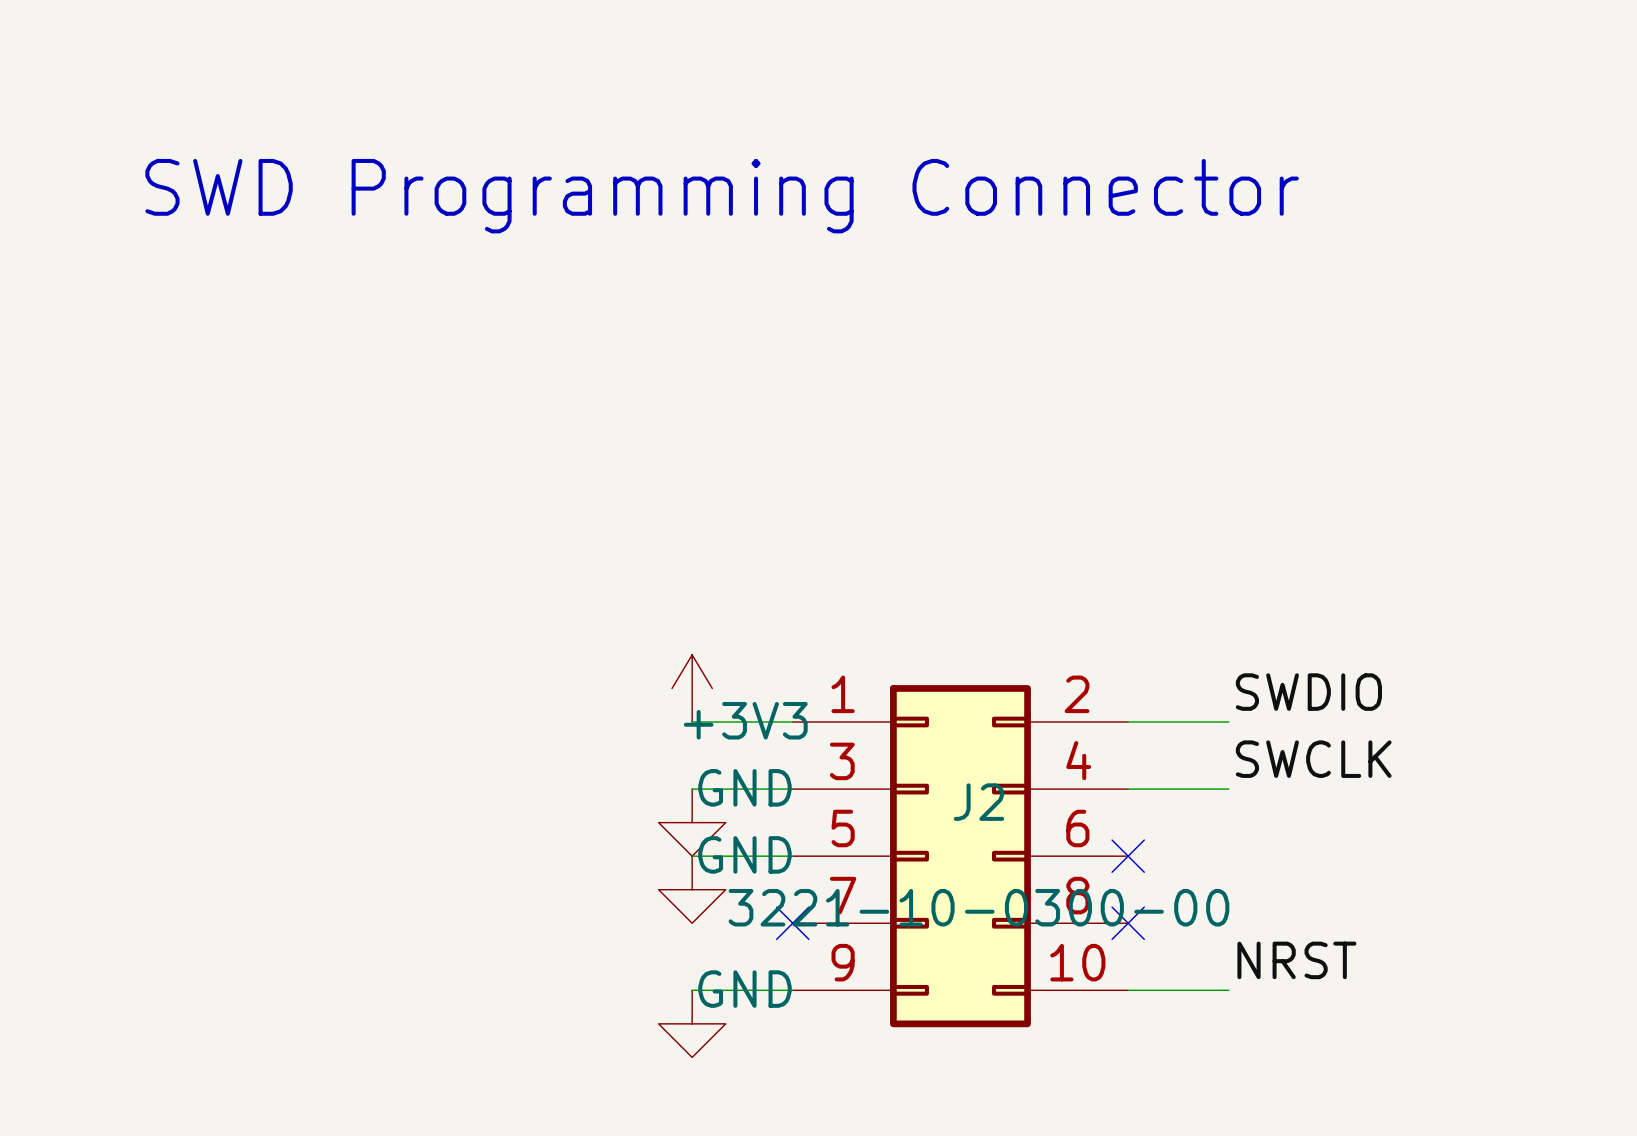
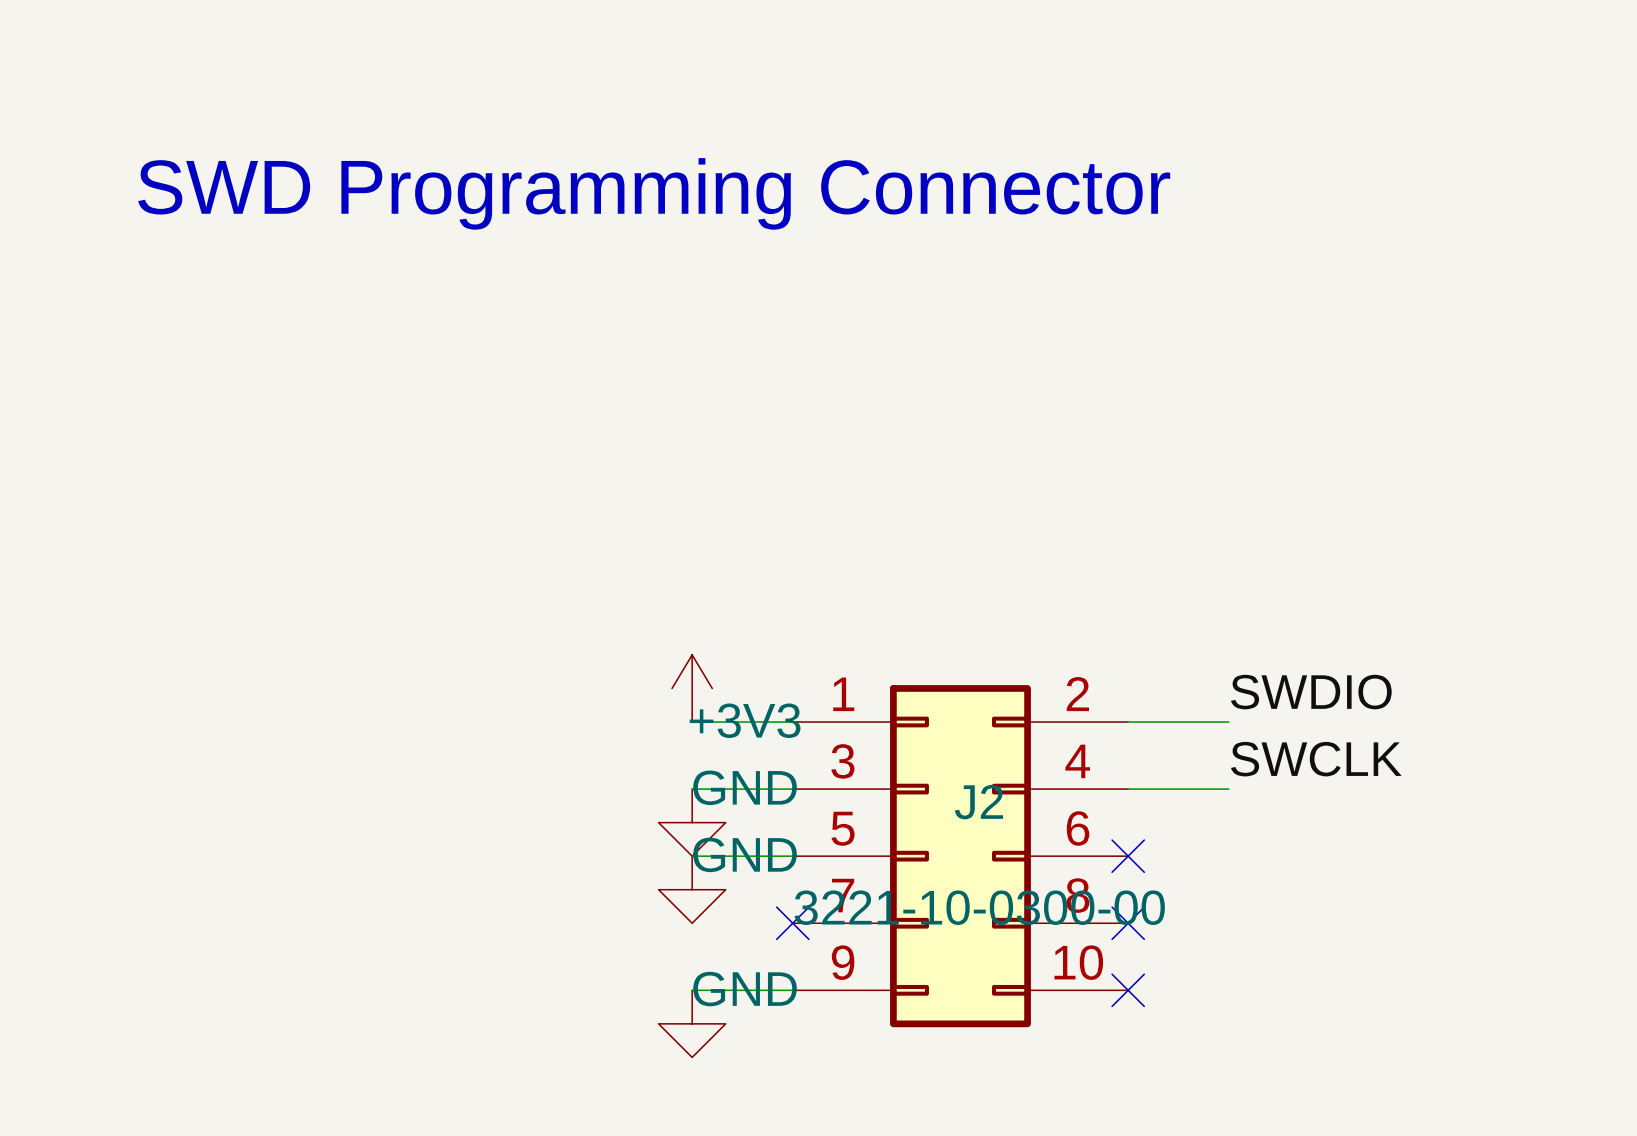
label: NRST (1296, 960) -> none
wire: (1128, 990) (1228, 990) -> none
no-connect mark: none -> (1128, 990)

